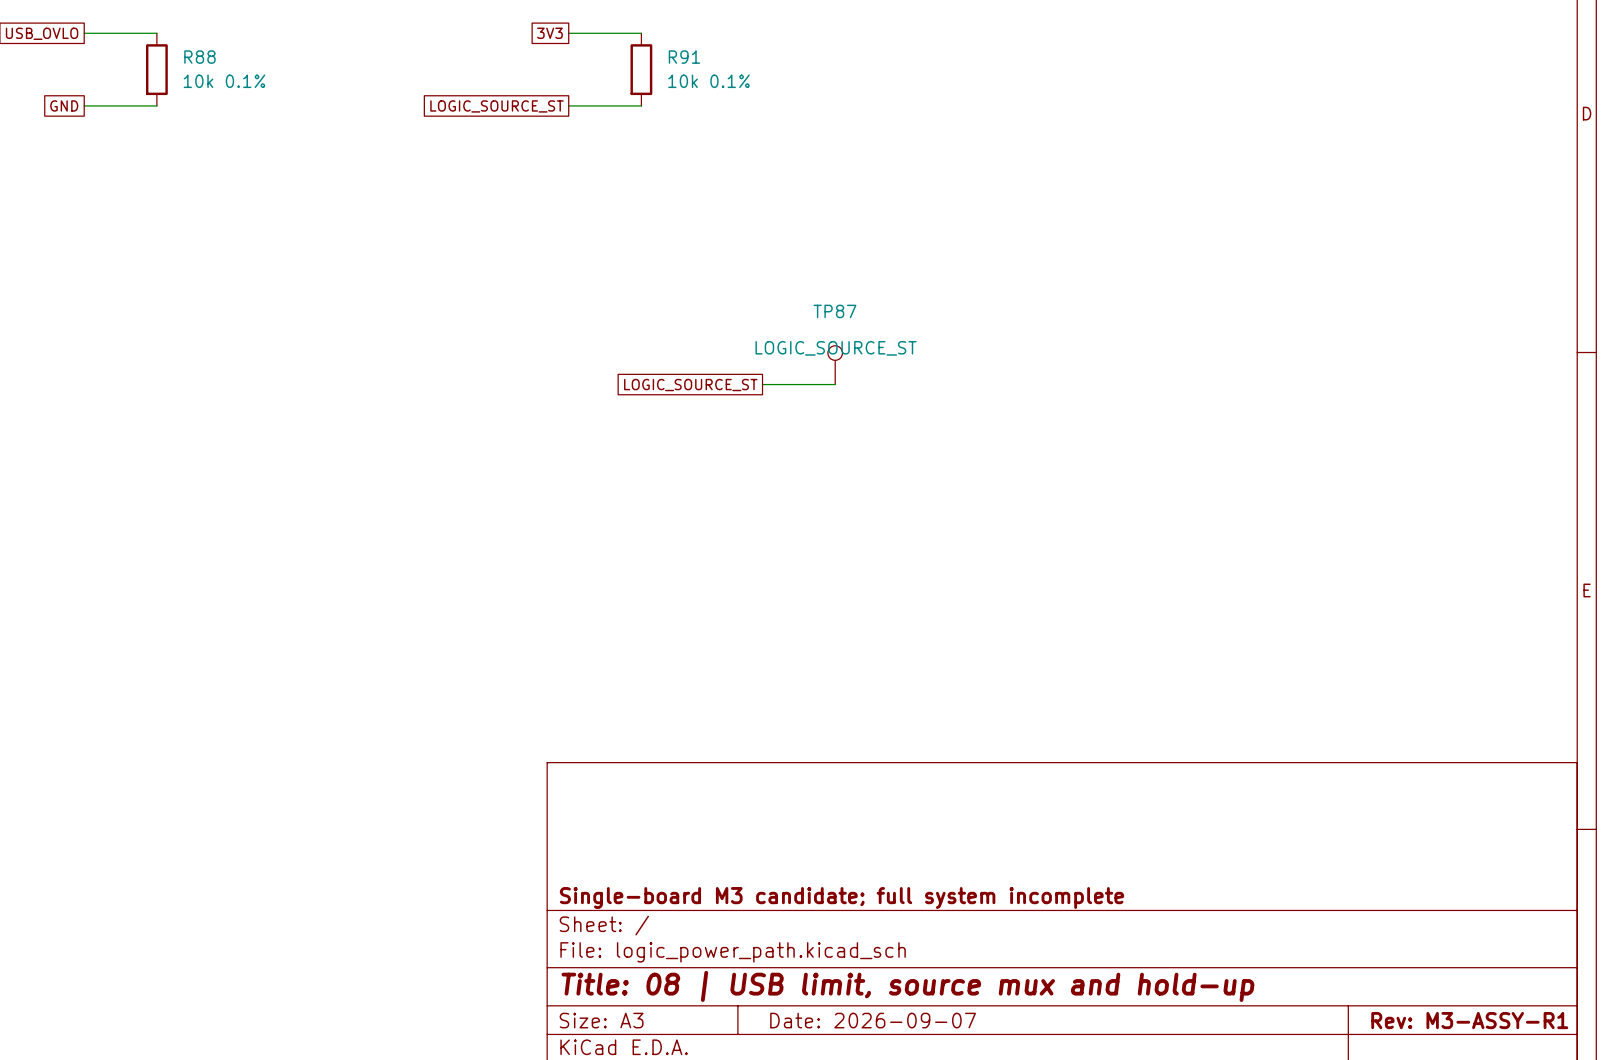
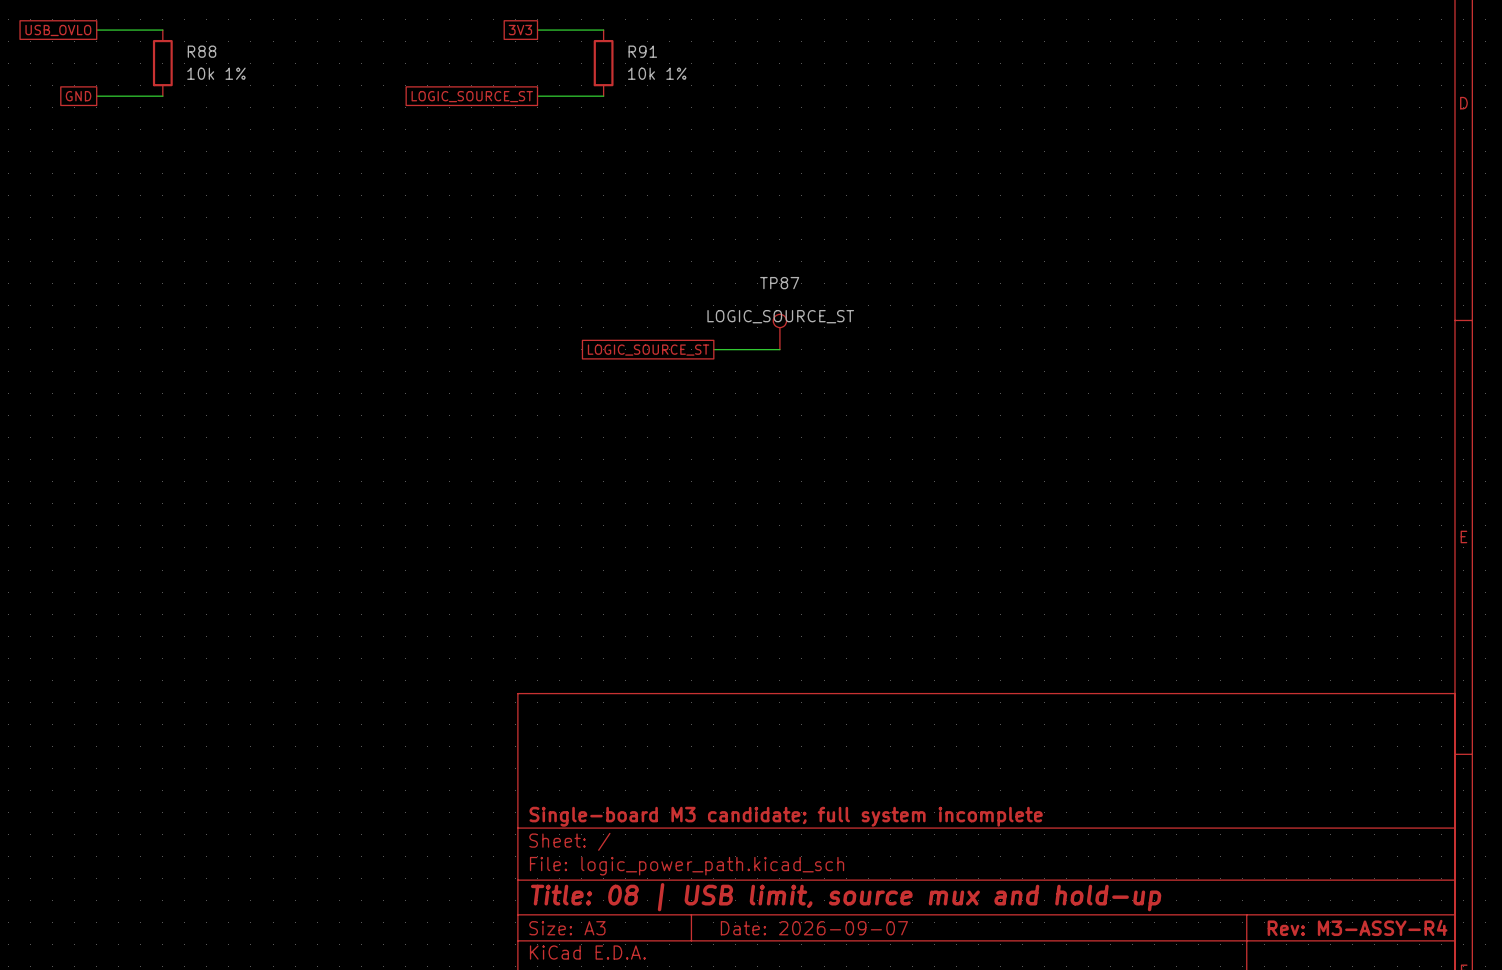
R88 value: 10k 0.1% (224, 81) -> 10k 1% (216, 73)
R91 value: 10k 0.1% (708, 81) -> 10k 1% (657, 73)
title block: Rev: M3-ASSY-R1 (1469, 1020) -> Rev: M3-ASSY-R4 (1357, 927)

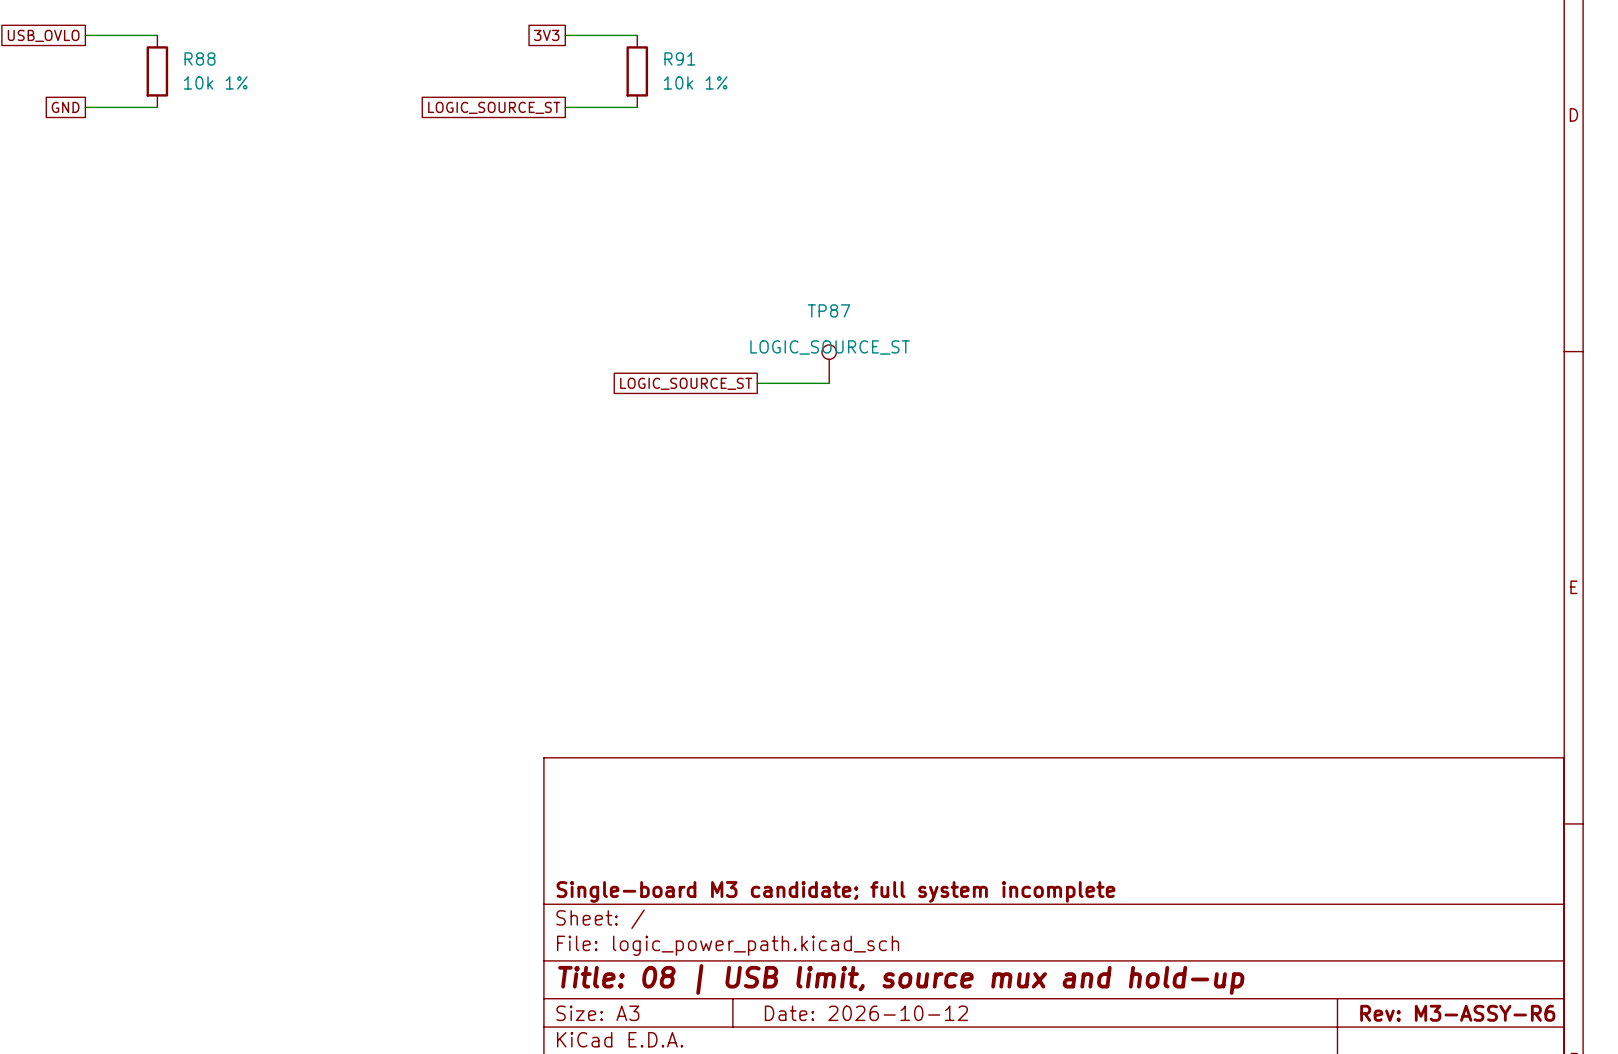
title block: Rev: M3-ASSY-R4 (1357, 927) -> Rev: M3-ASSY-R6 (1457, 1013)
title block: Date: 2026-09-07 (814, 928) -> Date: 2026-10-12 (866, 1013)

